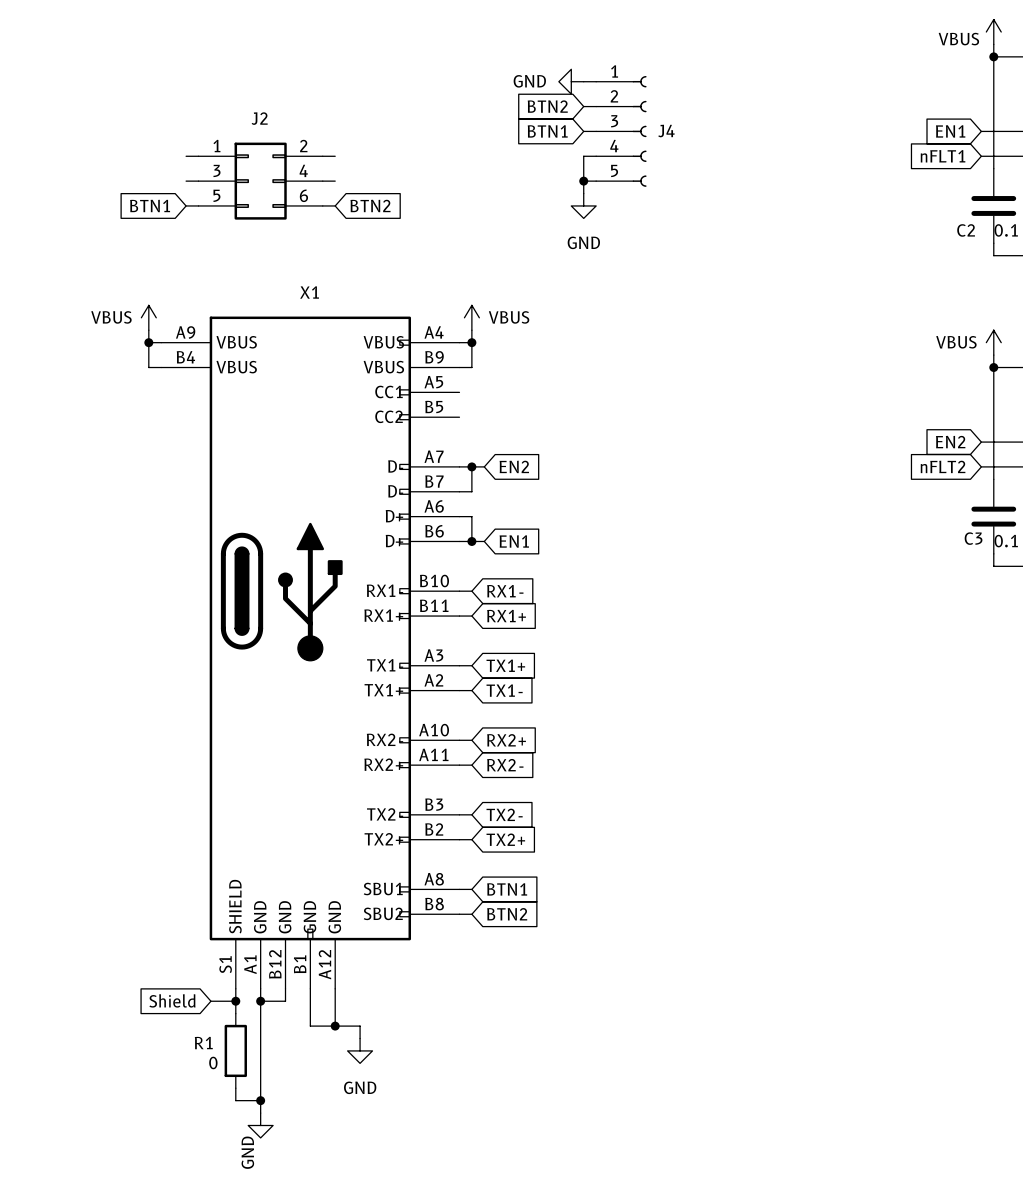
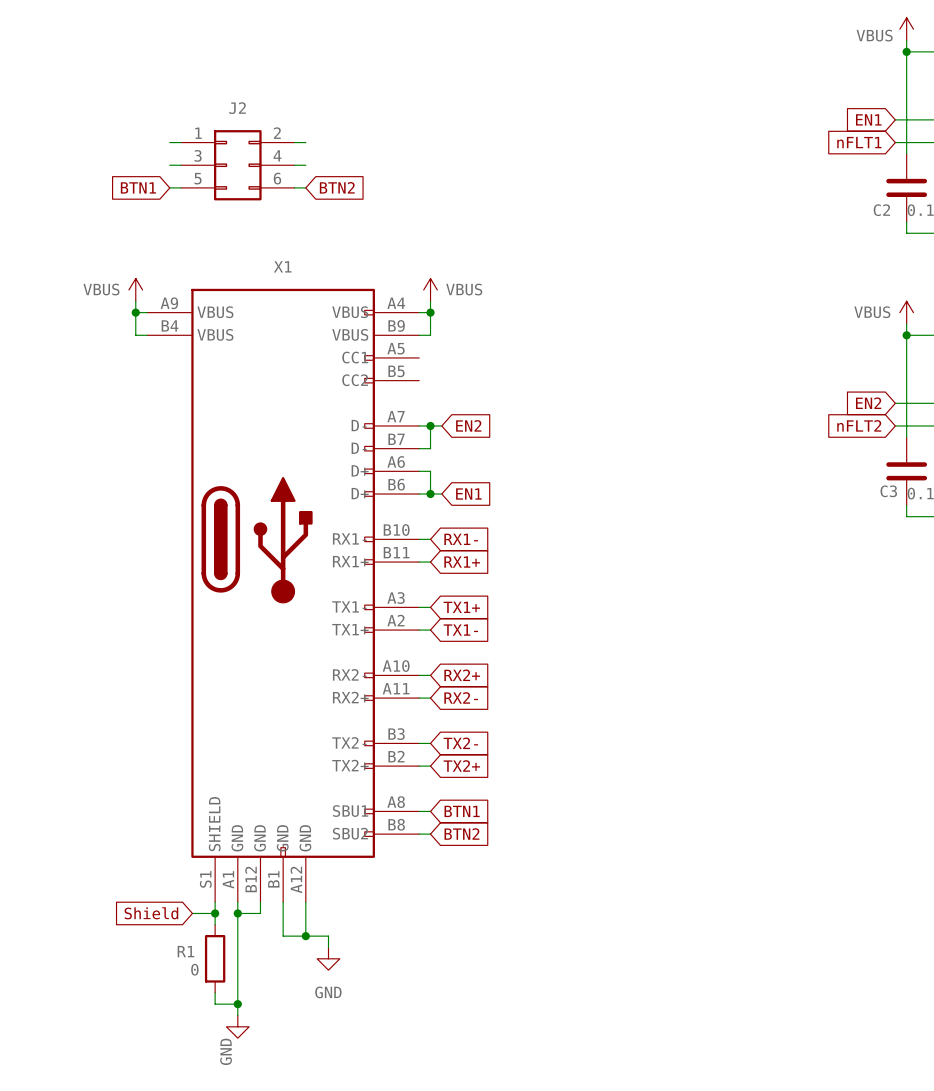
power symbol: GND (571, 81) -> none
wire: (583, 81) (596, 81) -> none
global label: BTN2 (547, 106) -> none
wire: (583, 106) (596, 106) -> none
global label: BTN1 (547, 131) -> none
wire: (583, 131) (596, 131) -> none
J4: (621, 131) -> none
wire: (596, 156) (583, 156) (583, 193) -> none
wire: (583, 181) (596, 181) -> none
junction: (583, 181) -> none
power symbol: GND (583, 205) -> none

